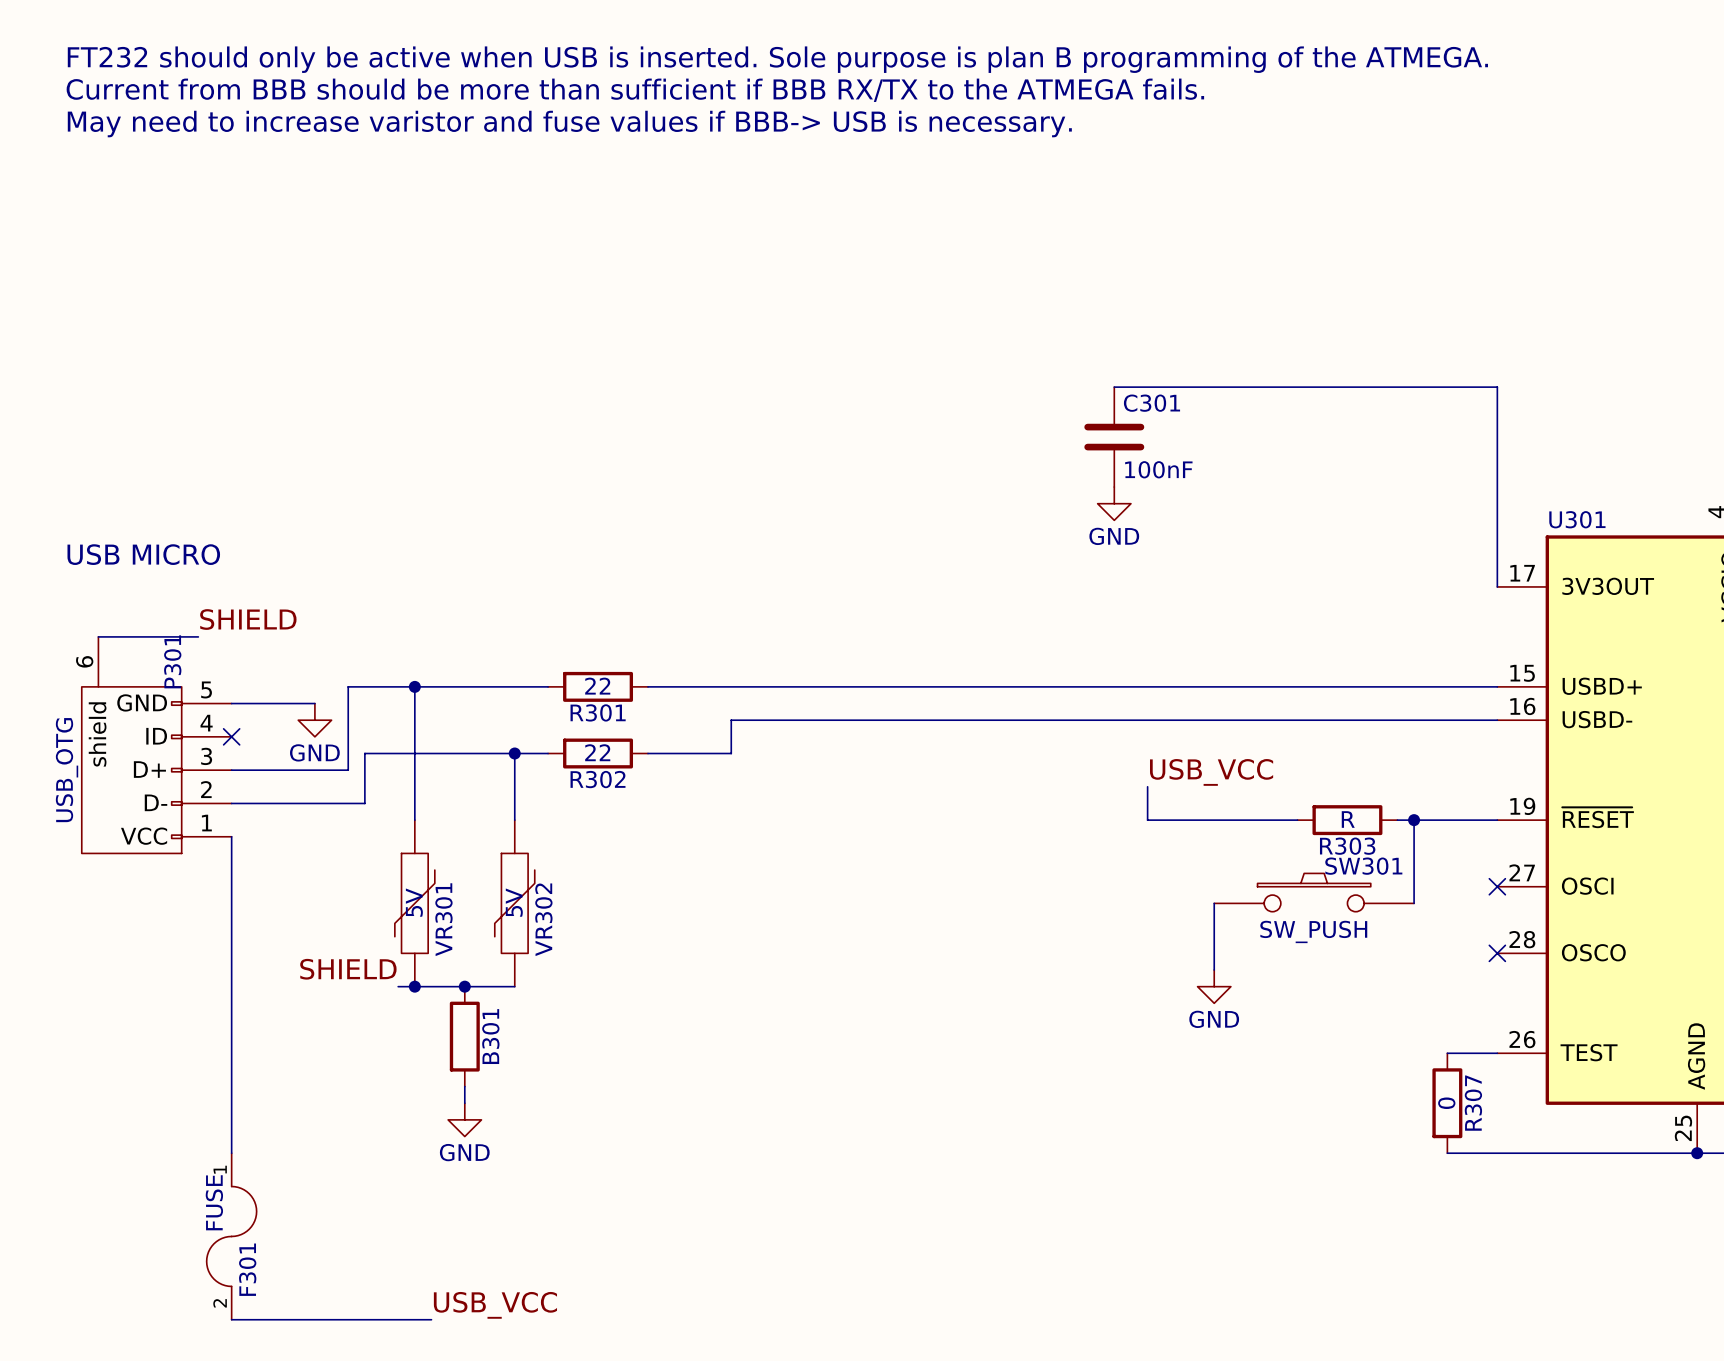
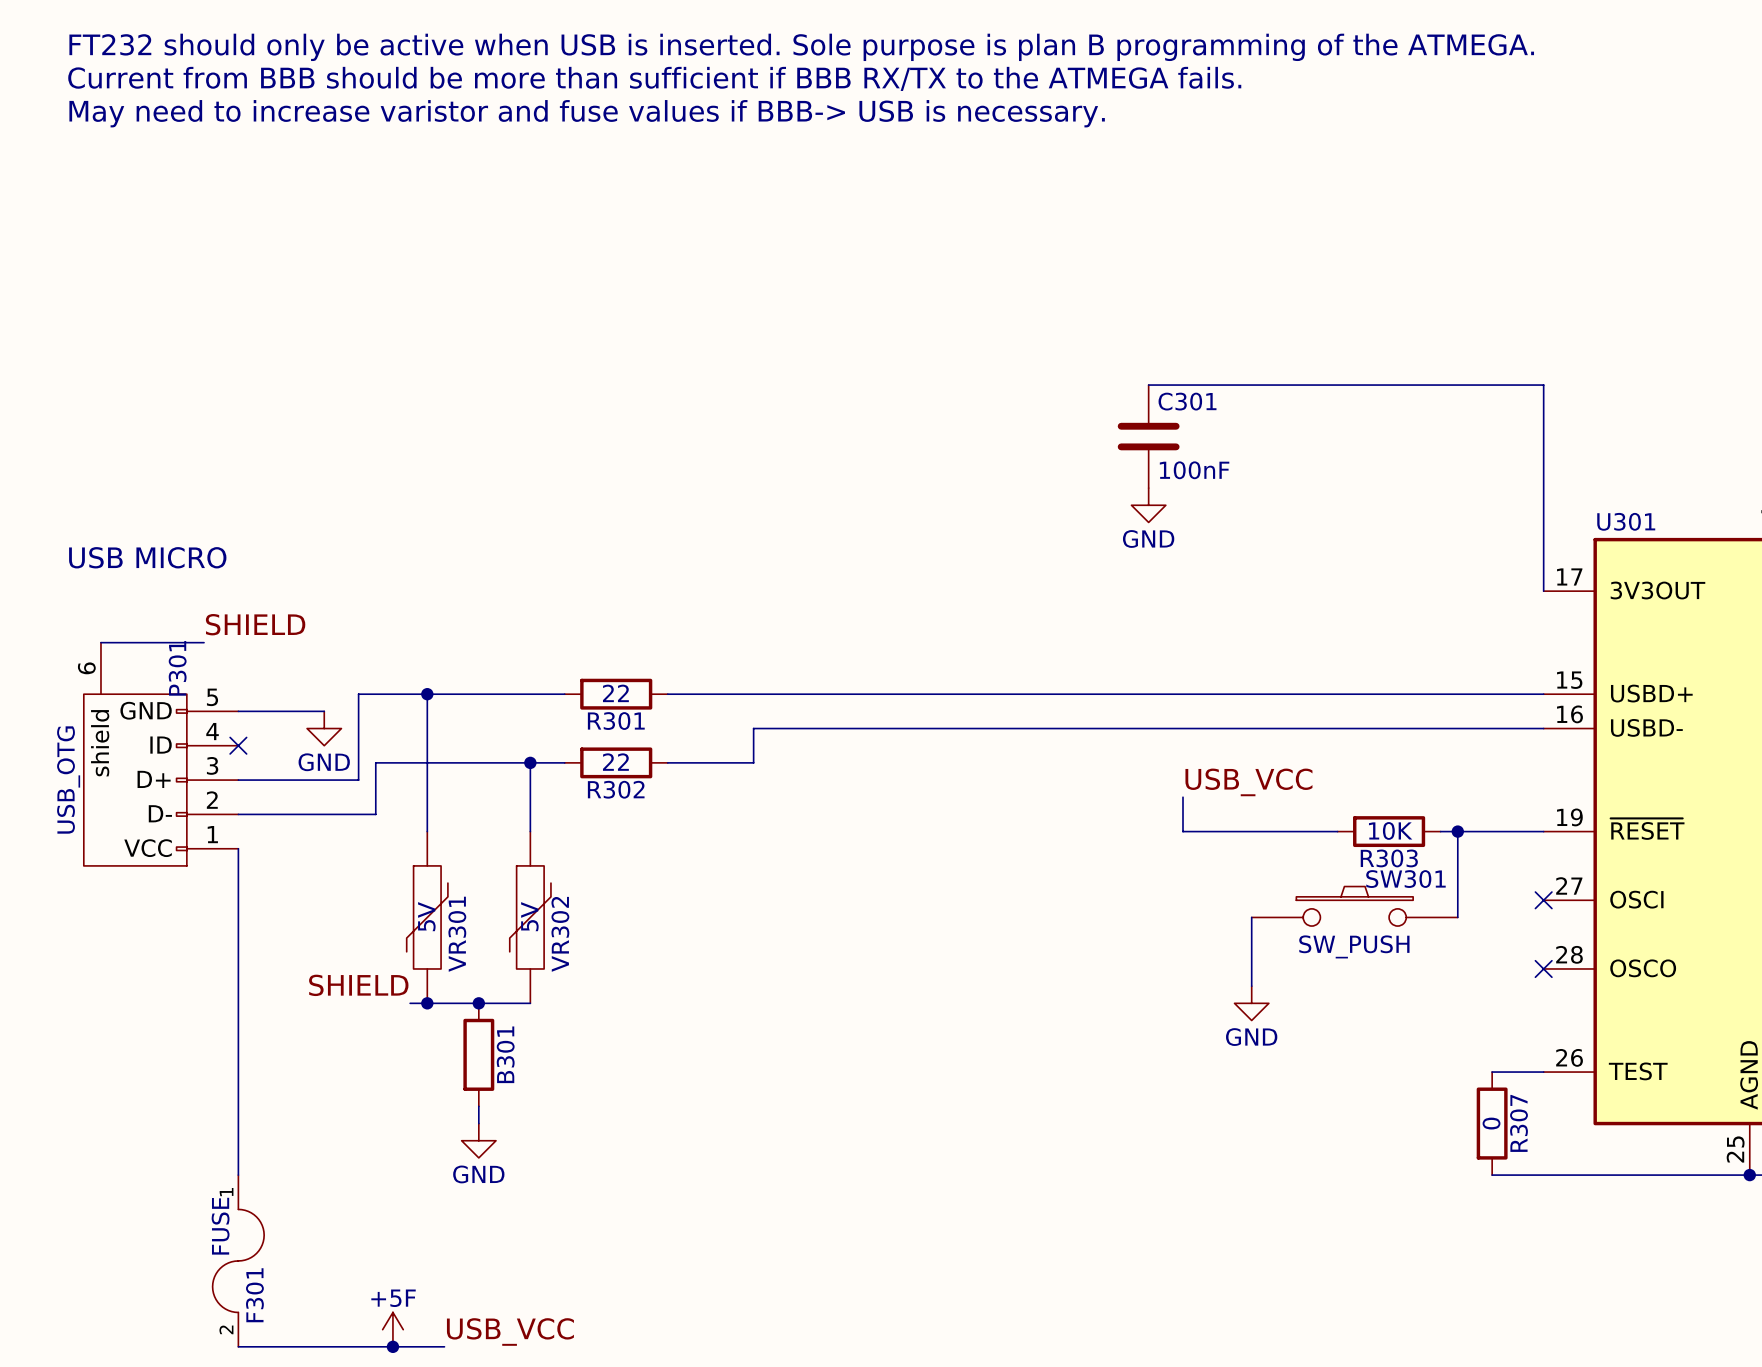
R303 value: R (1348, 819) -> 10K (1390, 830)
power symbol: none -> +5F (392, 1329)
junction: none -> (392, 1346)

